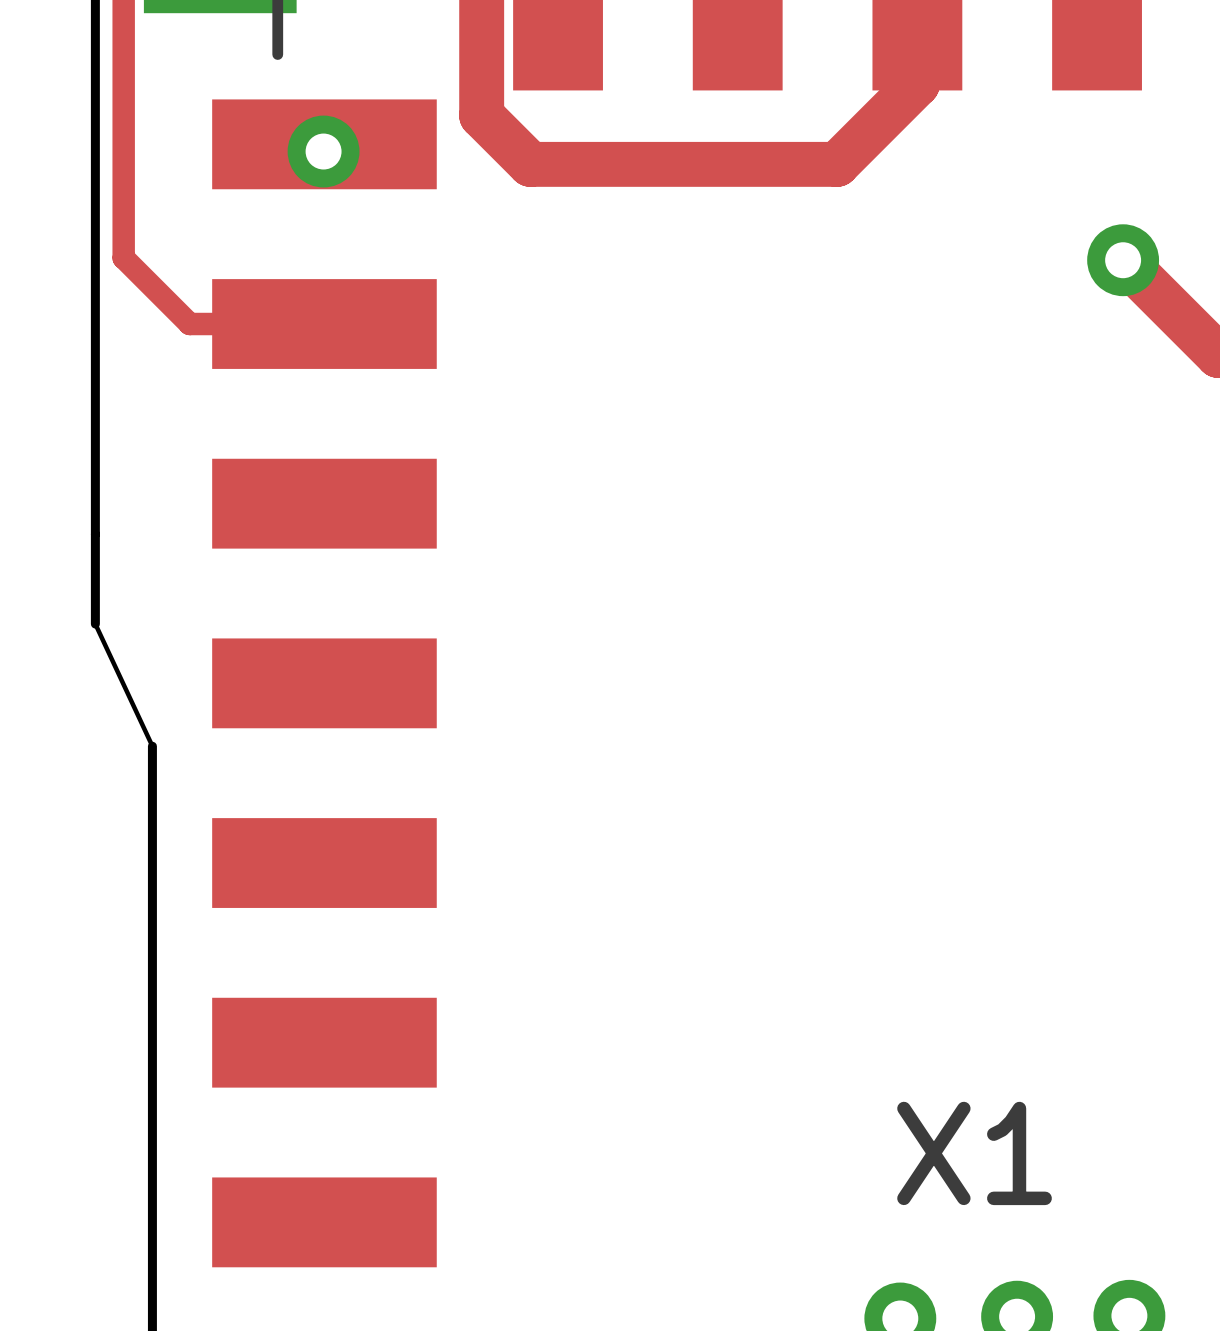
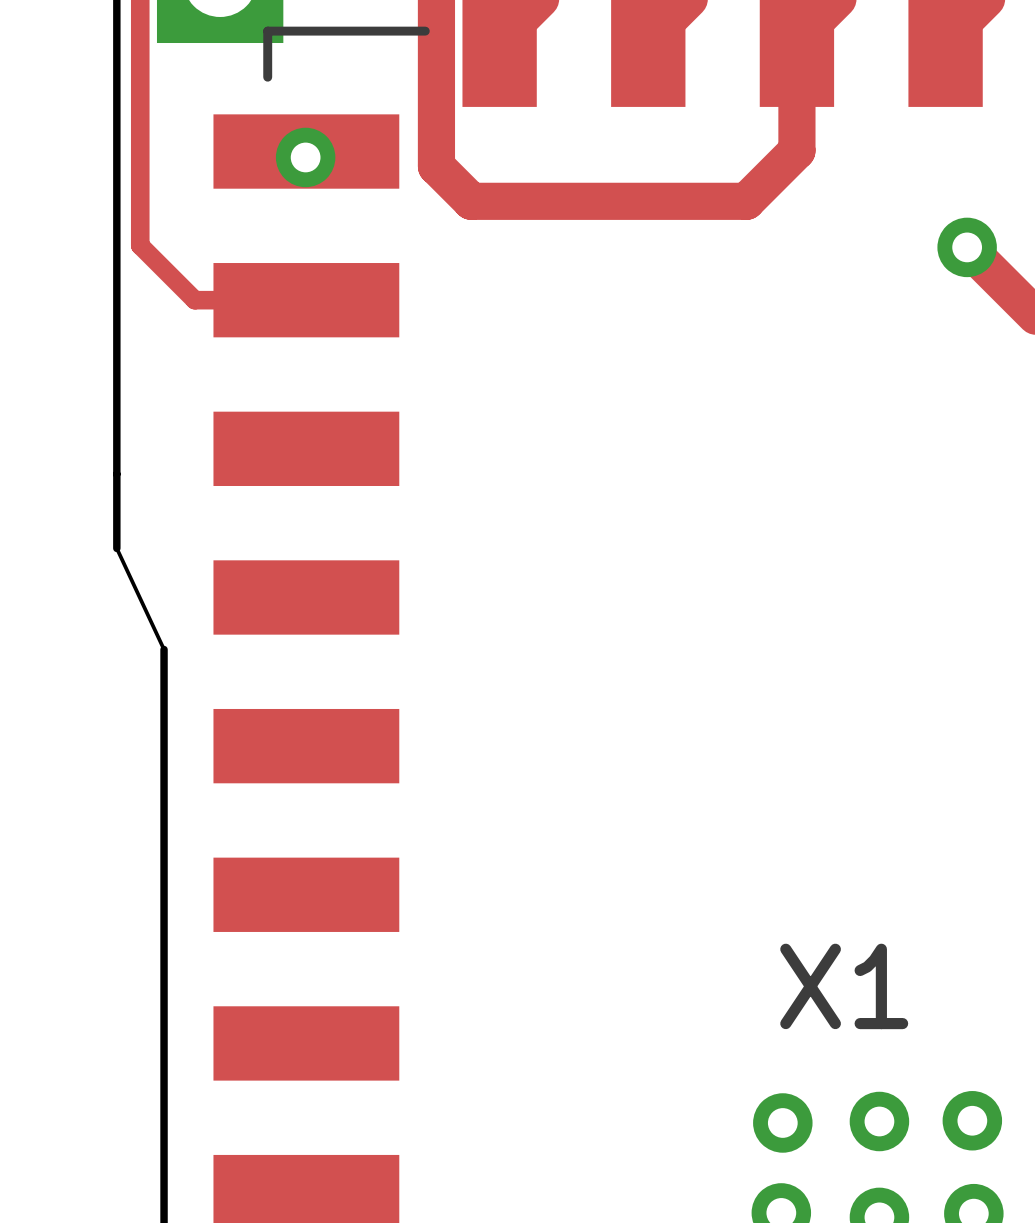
track: (917, 83) (836, 164) (530, 164) (481, 115) -> (796, 101) (796, 150) (746, 201) (471, 201) (436, 166) (436, 127)

